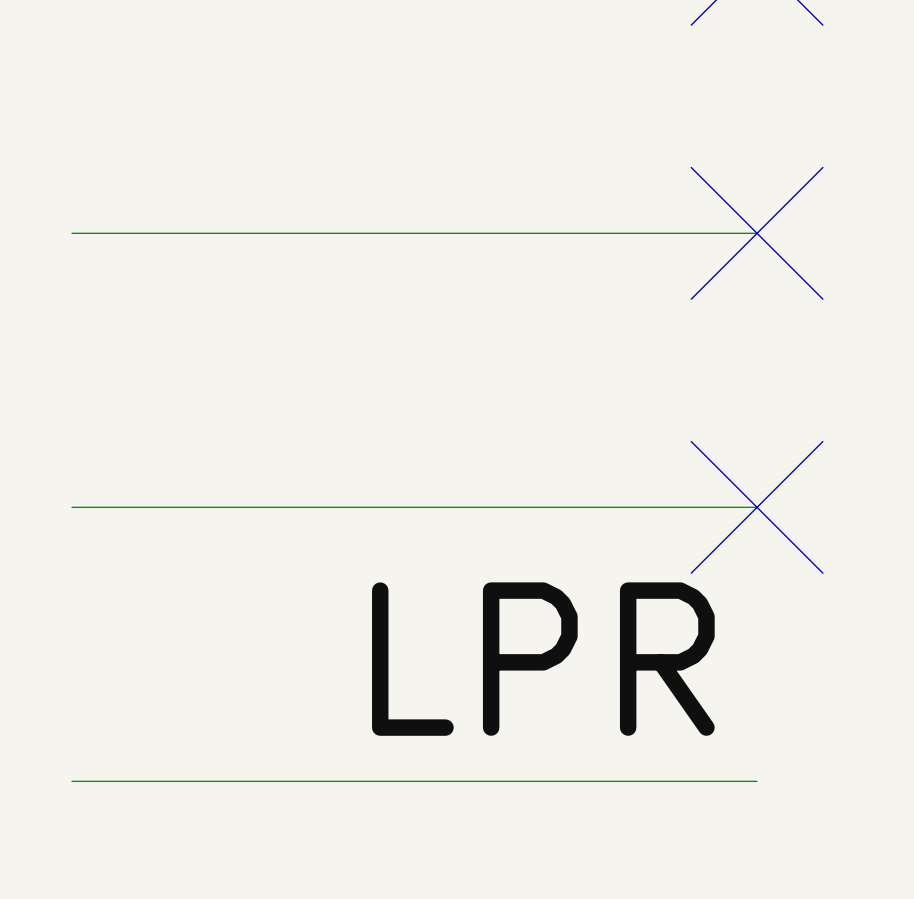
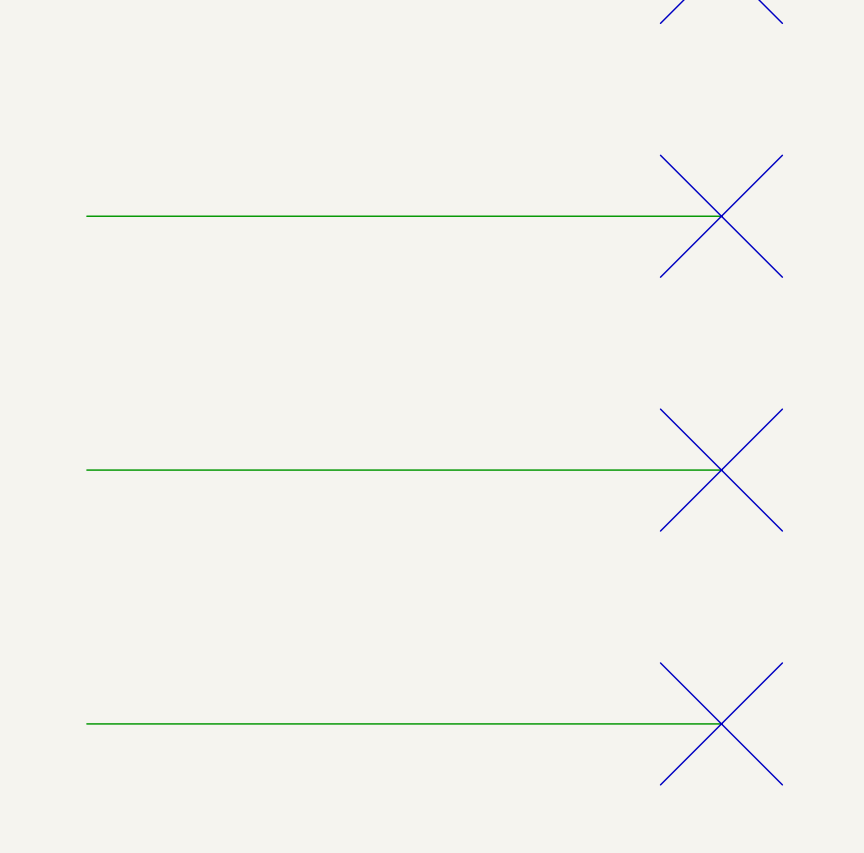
label: LPR (543, 659) -> none
no-connect mark: none -> (721, 723)

